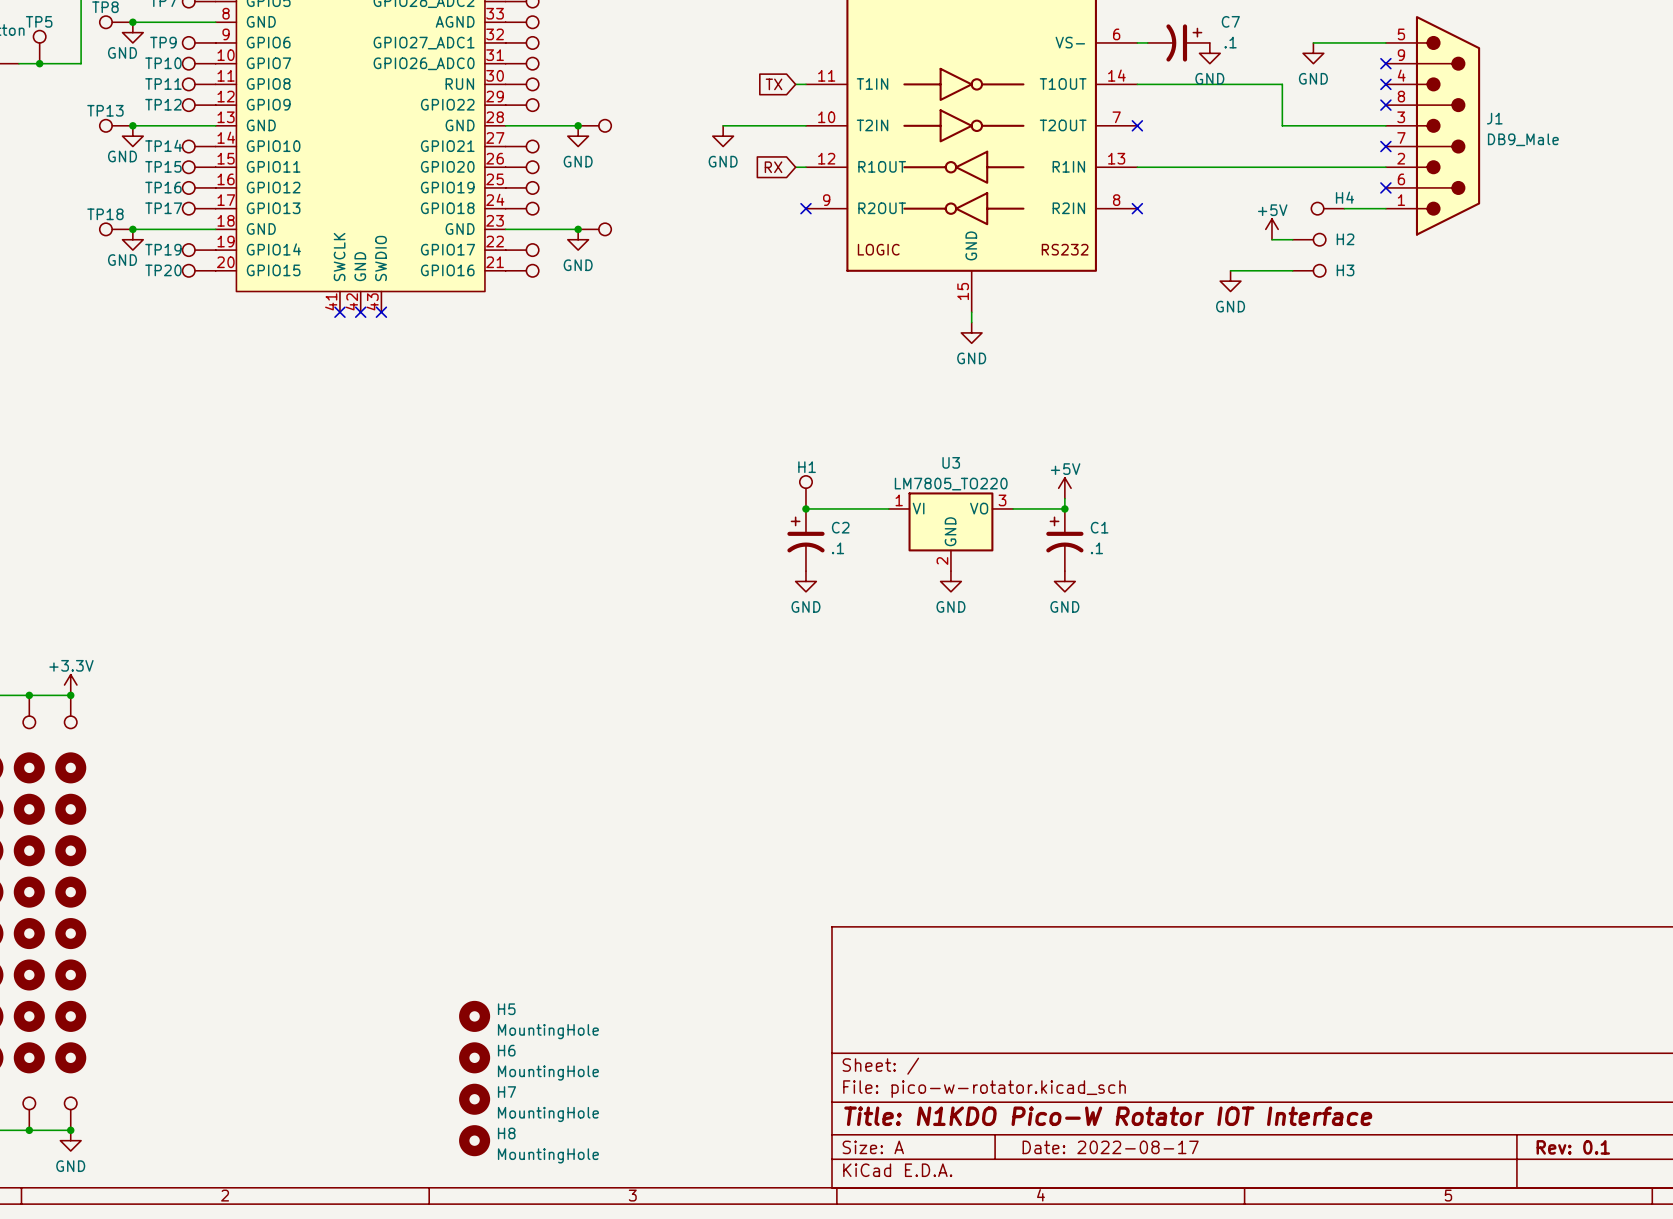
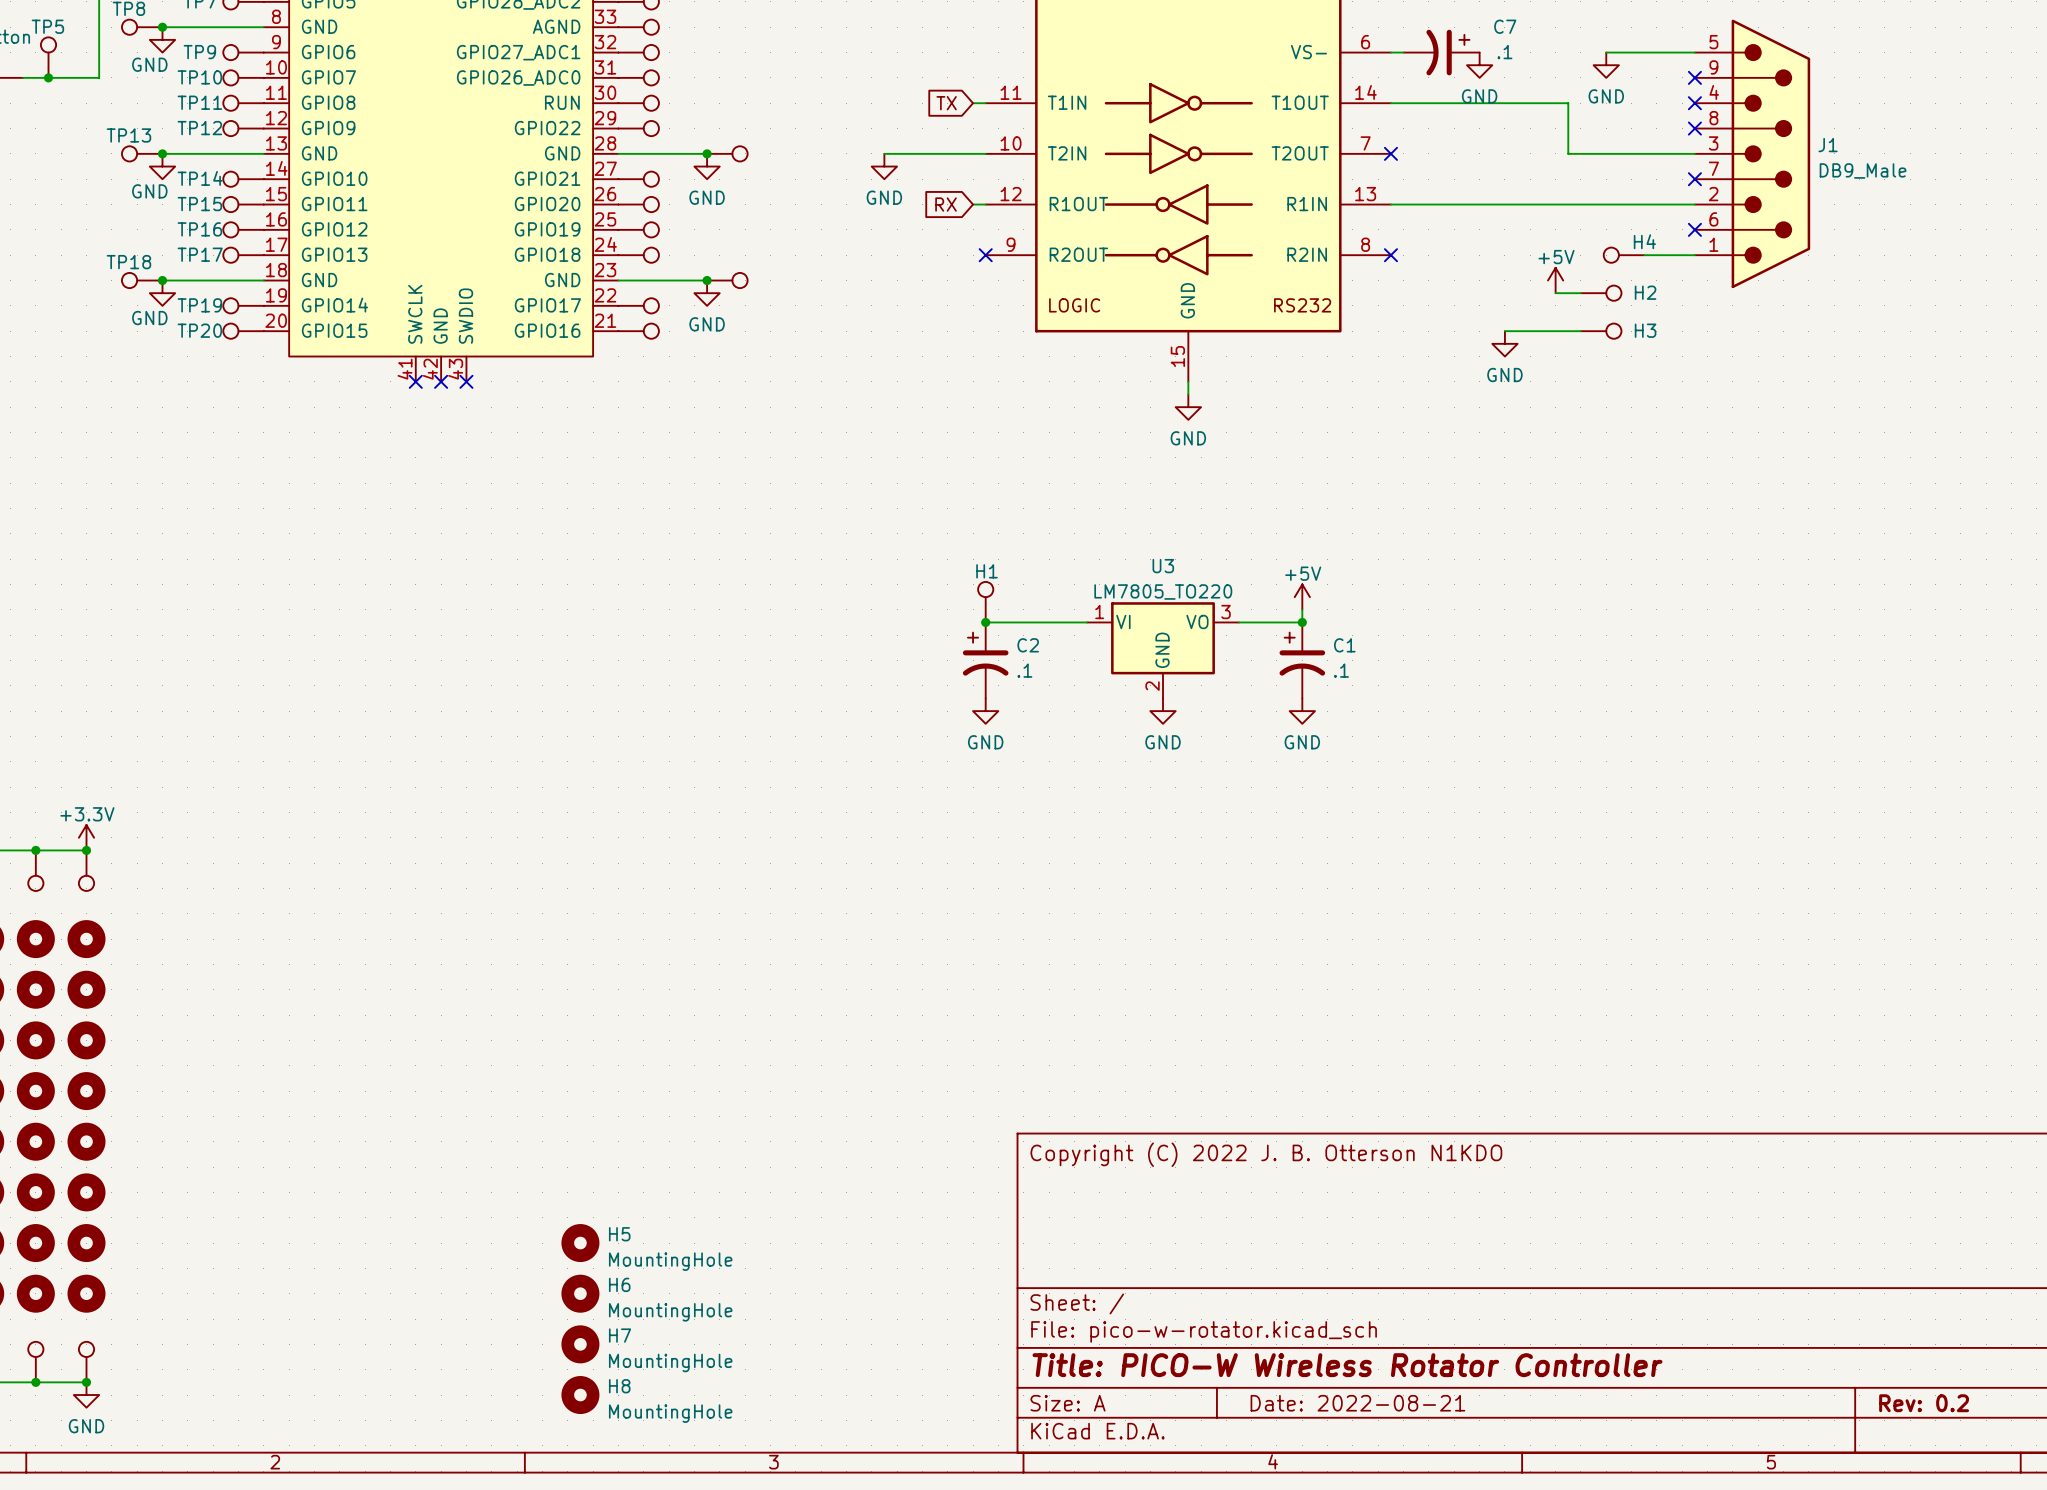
title block: none -> Copyright (C) 2022 J. B. Otterson N1KDO (1266, 1154)
title block: Title: N1KDO Pico-W Rotator IOT Interface (1108, 1116) -> Title: PICO-W Wireless Rotator Controller (1347, 1365)
title block: Date: 2022-08-17 (1110, 1147) -> Date: 2022-08-21 (1357, 1403)
title block: Rev: 0.1 (1573, 1147) -> Rev: 0.2 (1924, 1403)

